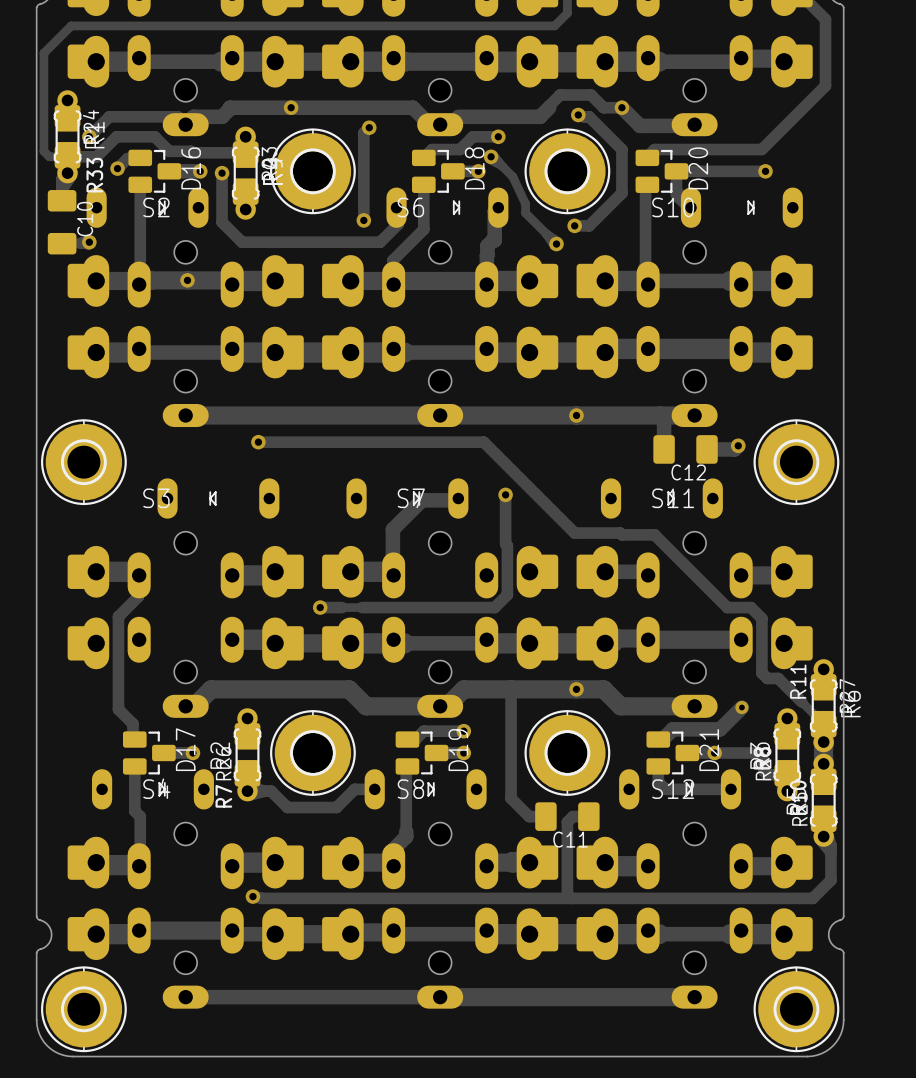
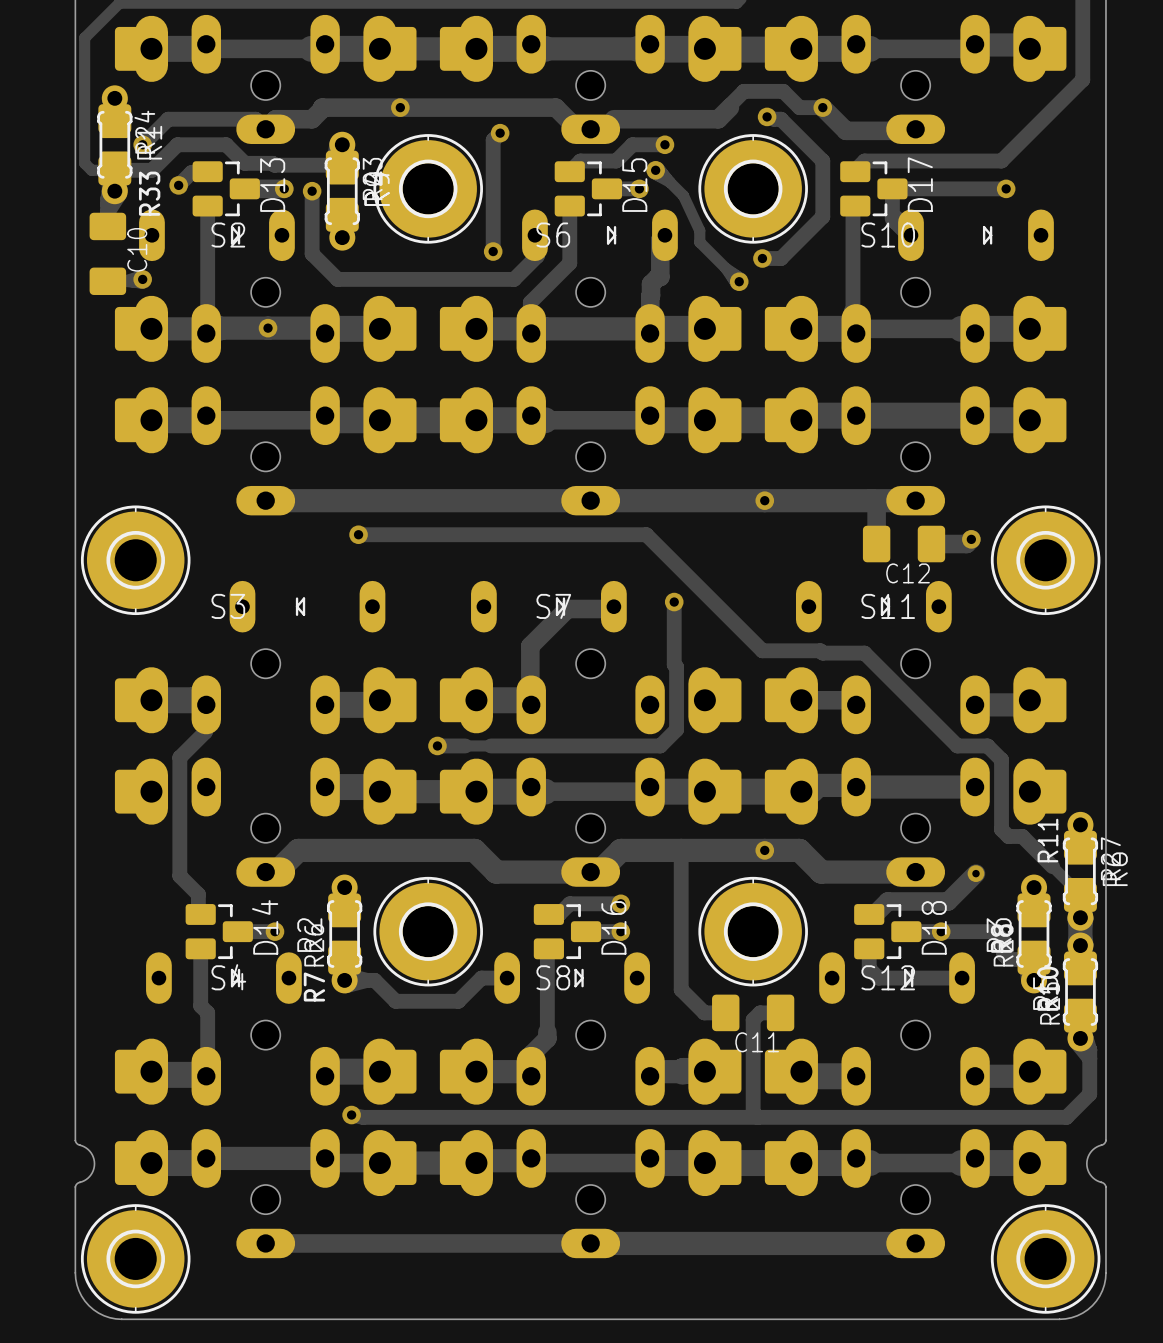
D16 name: D16 (191, 168) -> D13 (272, 185)
D18 name: D18 (474, 168) -> D15 (634, 185)
D20 name: D20 (698, 168) -> D17 (920, 184)
D17 name: D17 (185, 749) -> D14 (265, 927)
D19 name: D19 (458, 750) -> D16 (613, 927)
D21 name: D21 (709, 750) -> D18 (934, 927)

